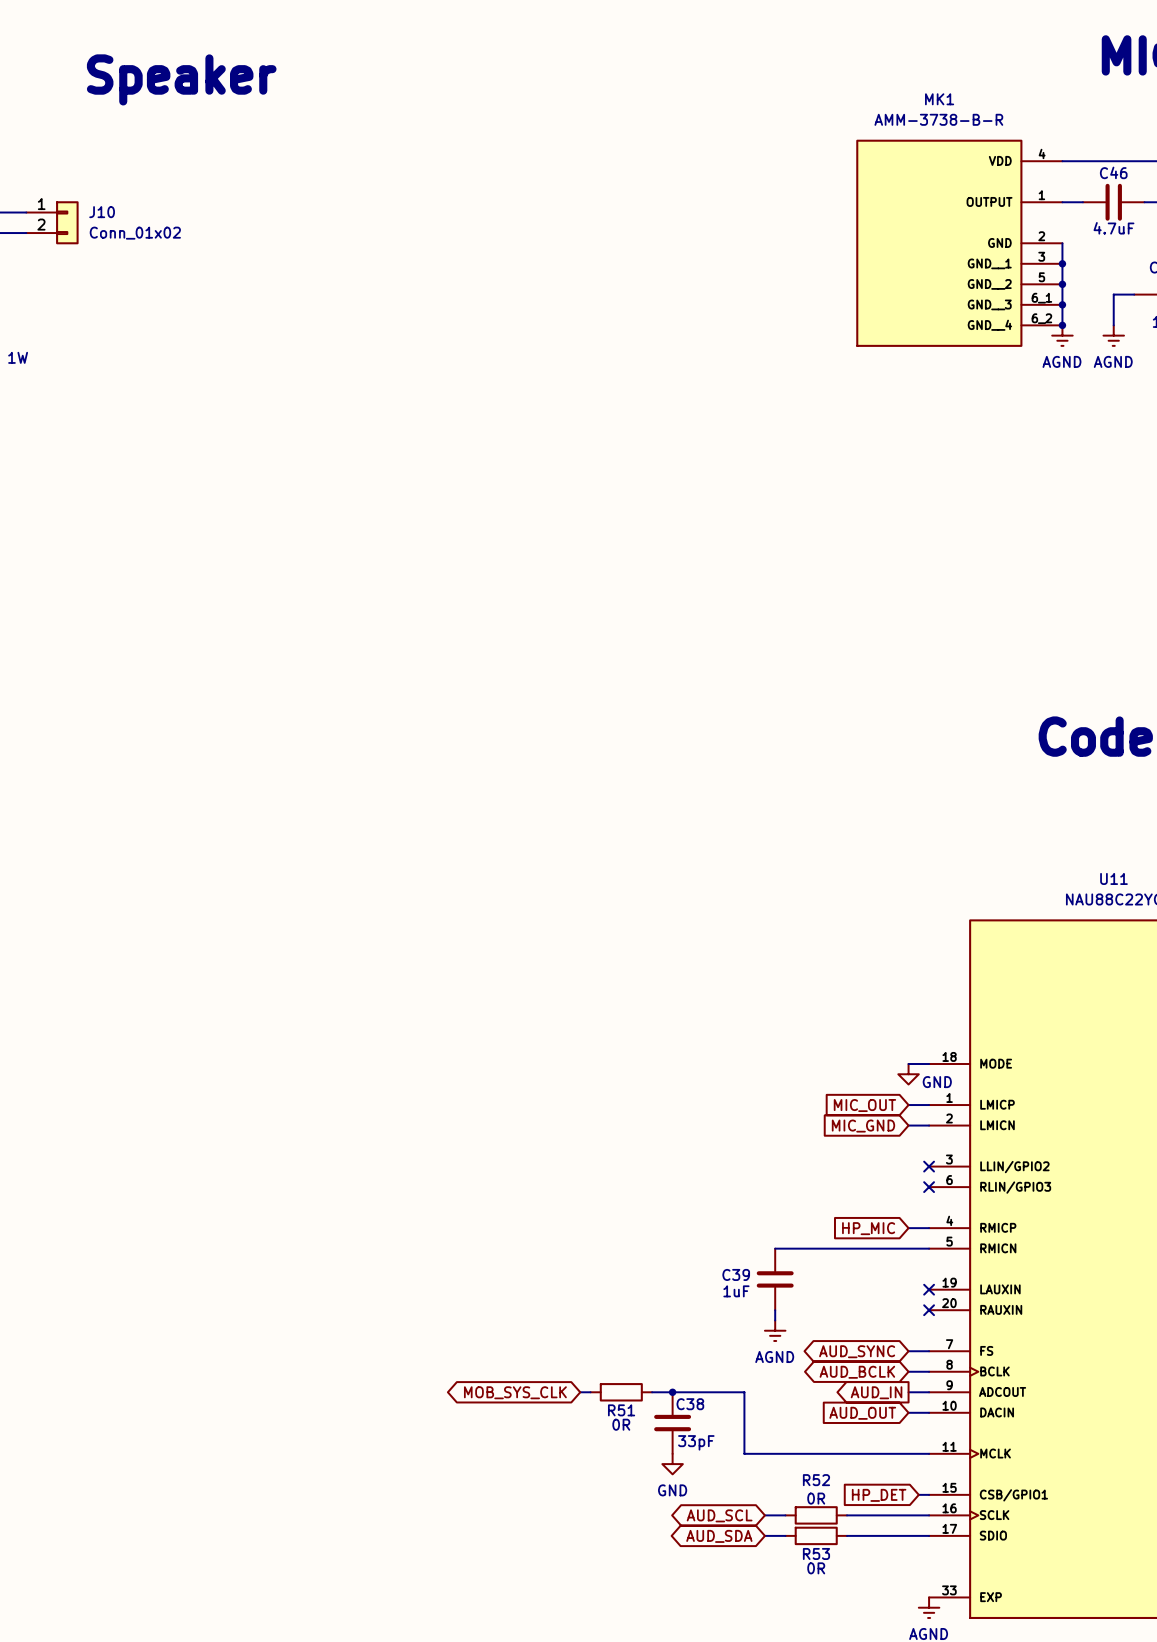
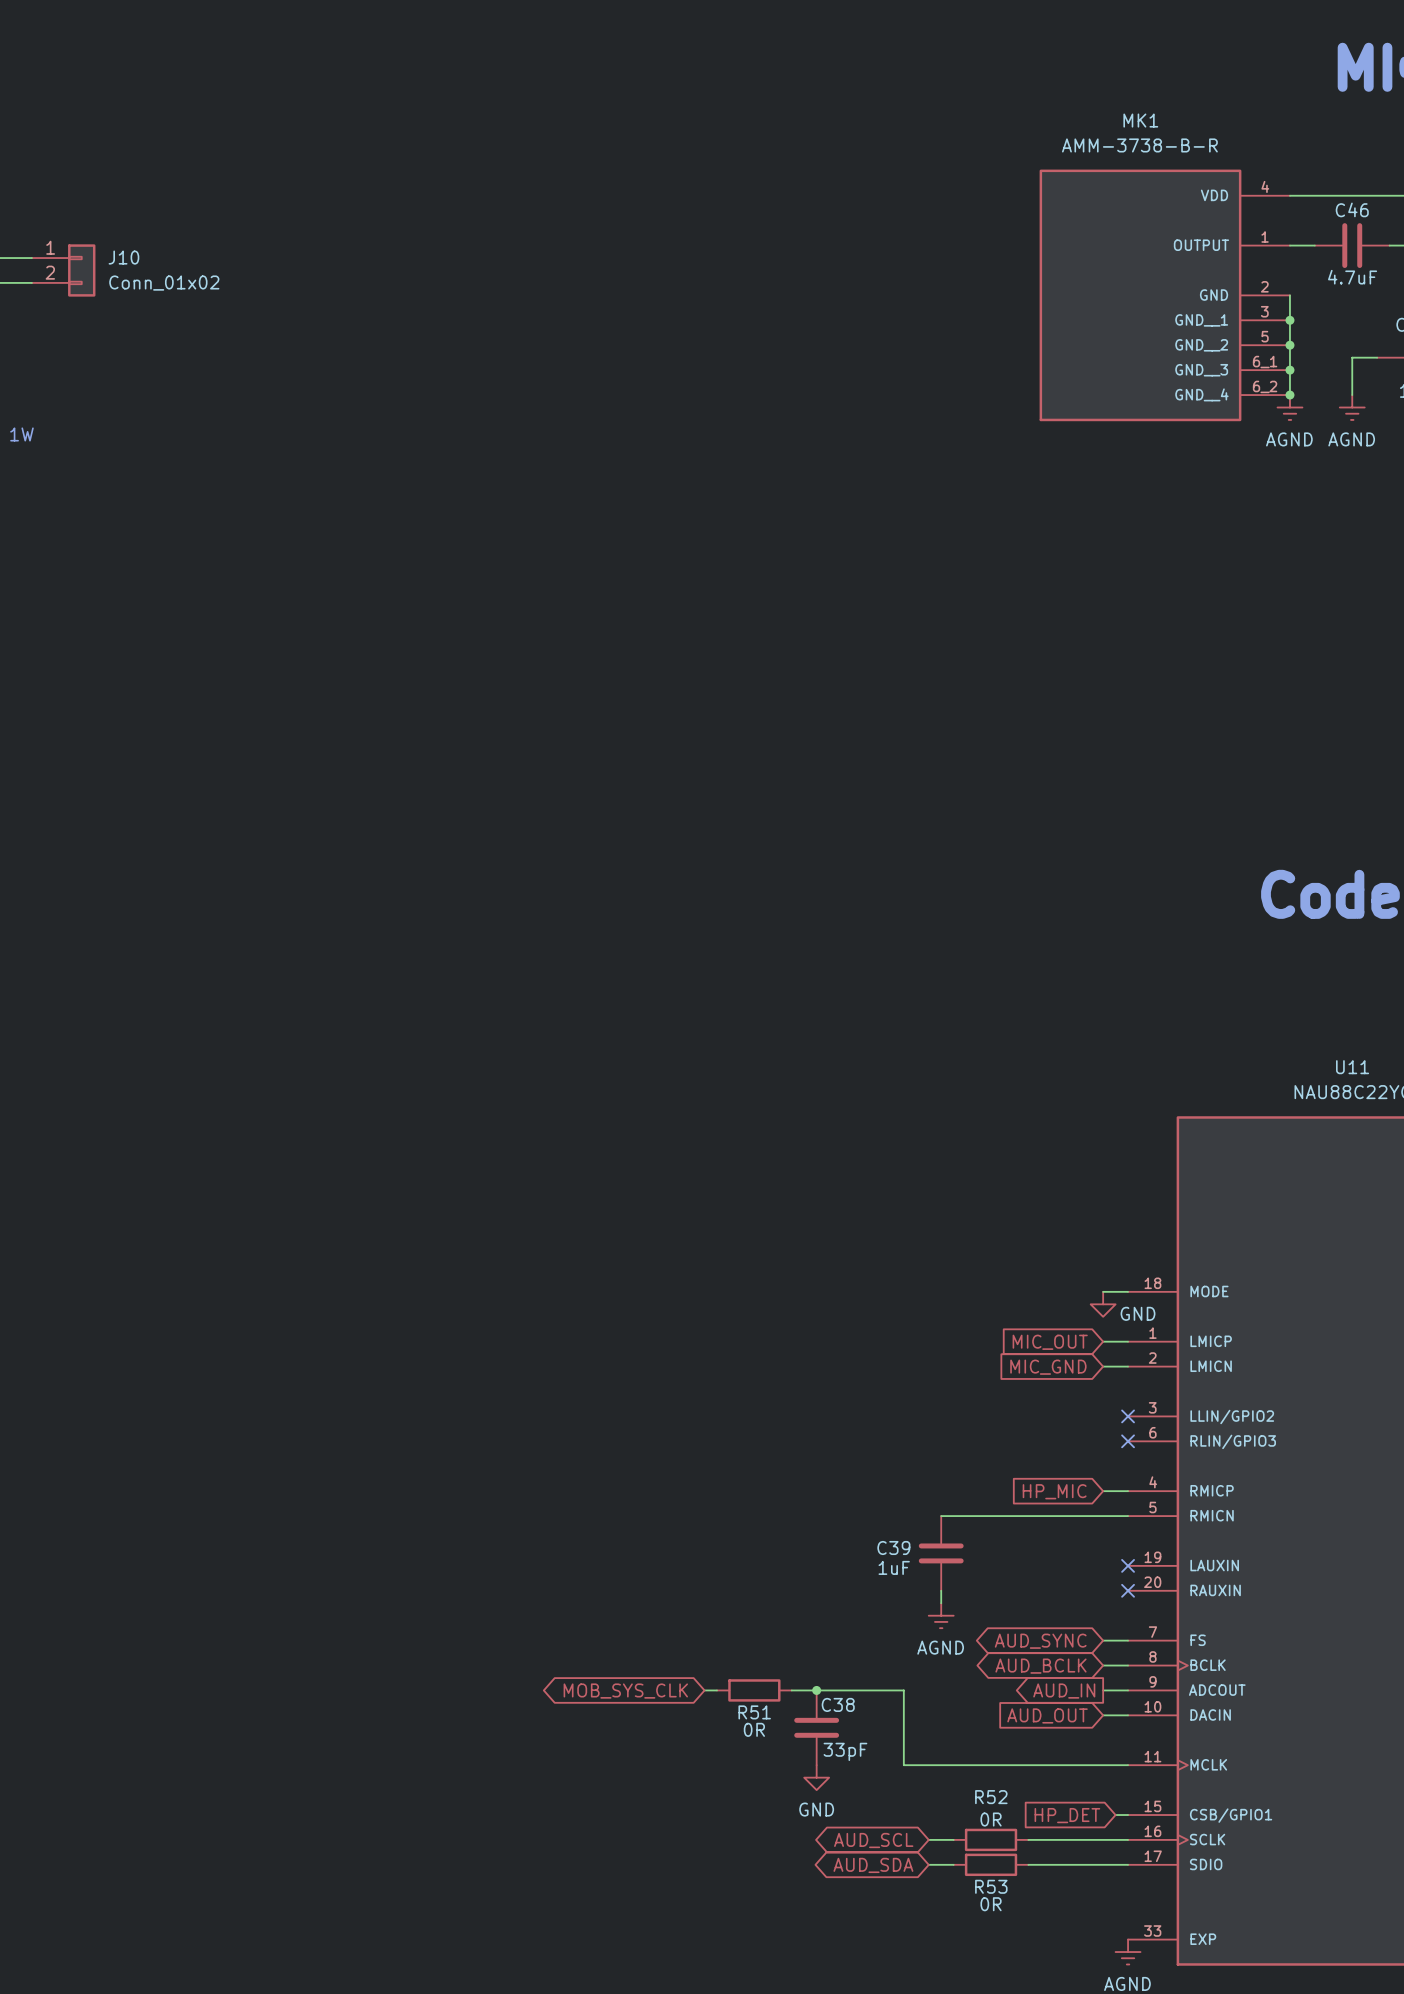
text: Speaker (181, 79) -> none

